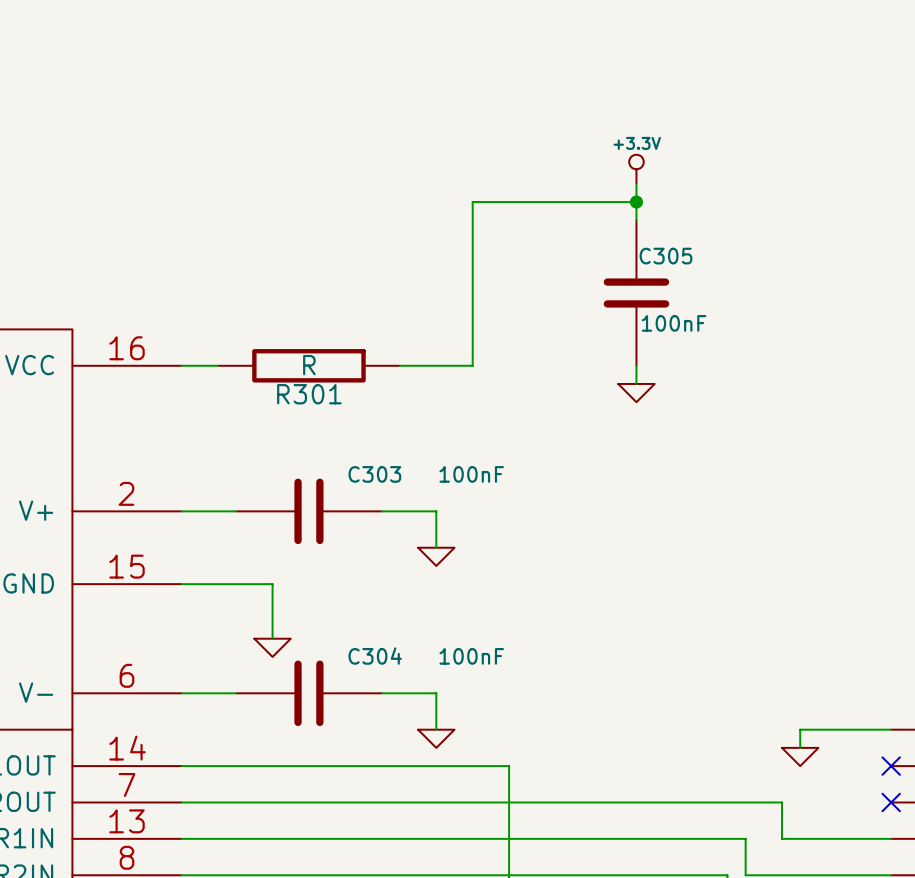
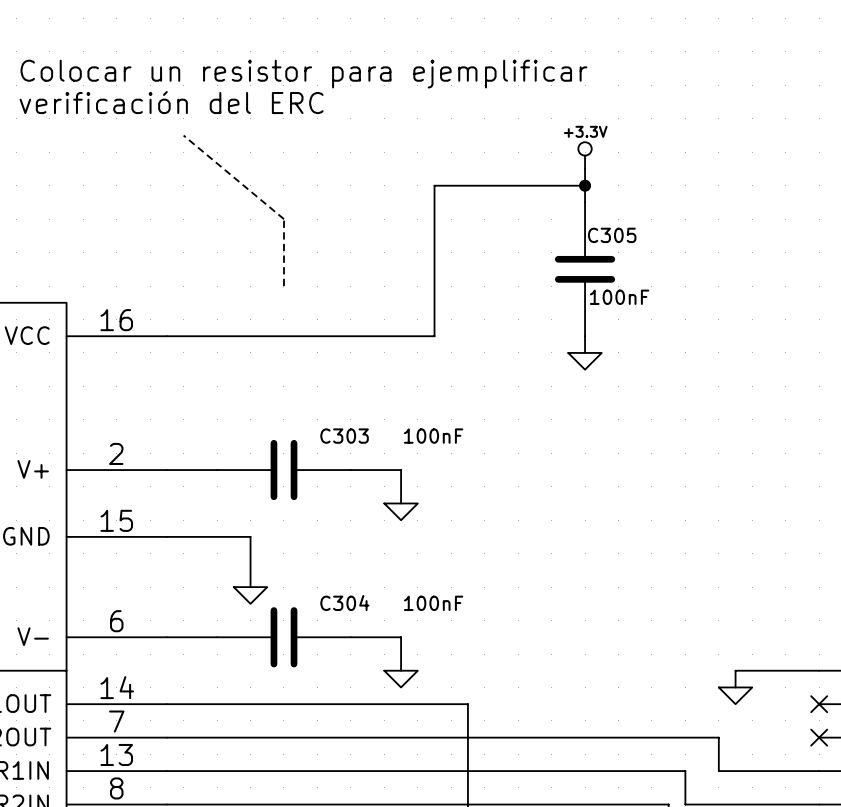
text: none -> Colocar un resistor para ejemplificar (303, 74)
text: none -> verificación del ERC (171, 102)
line: none -> (183, 135) (283, 219) (283, 286)
wire: none -> (200, 336) (367, 336)
R301: R (308, 365) -> none

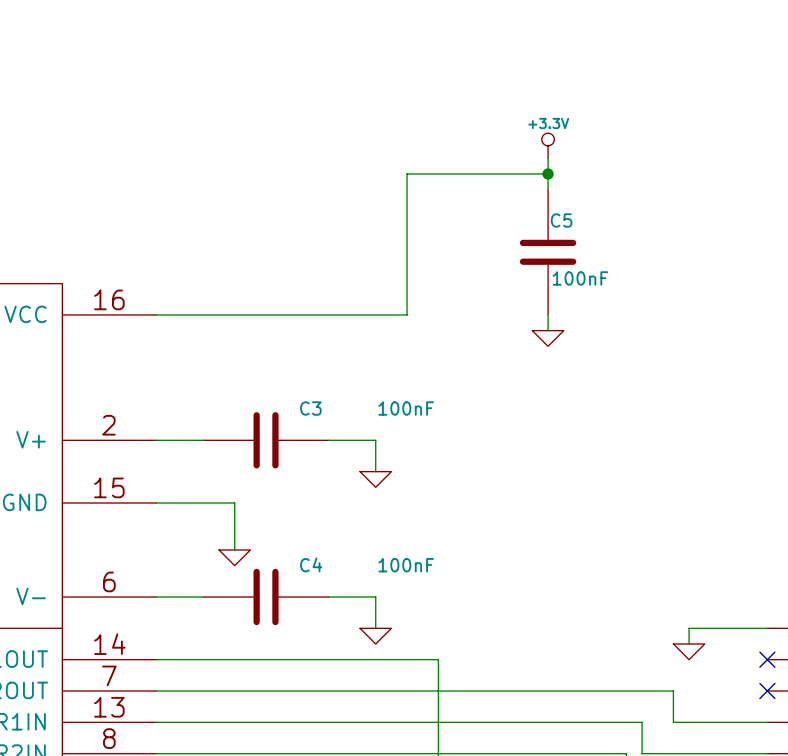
text: Colocar un resistor para ejemplificar (303, 74) -> none
text: verificación del ERC (171, 102) -> none
line: (183, 135) (283, 219) (283, 286) -> none
C305 name: C305 (612, 235) -> C5 (561, 220)
C303 name: C303 (344, 436) -> C3 (310, 408)
C304 name: C304 (344, 603) -> C4 (311, 564)

